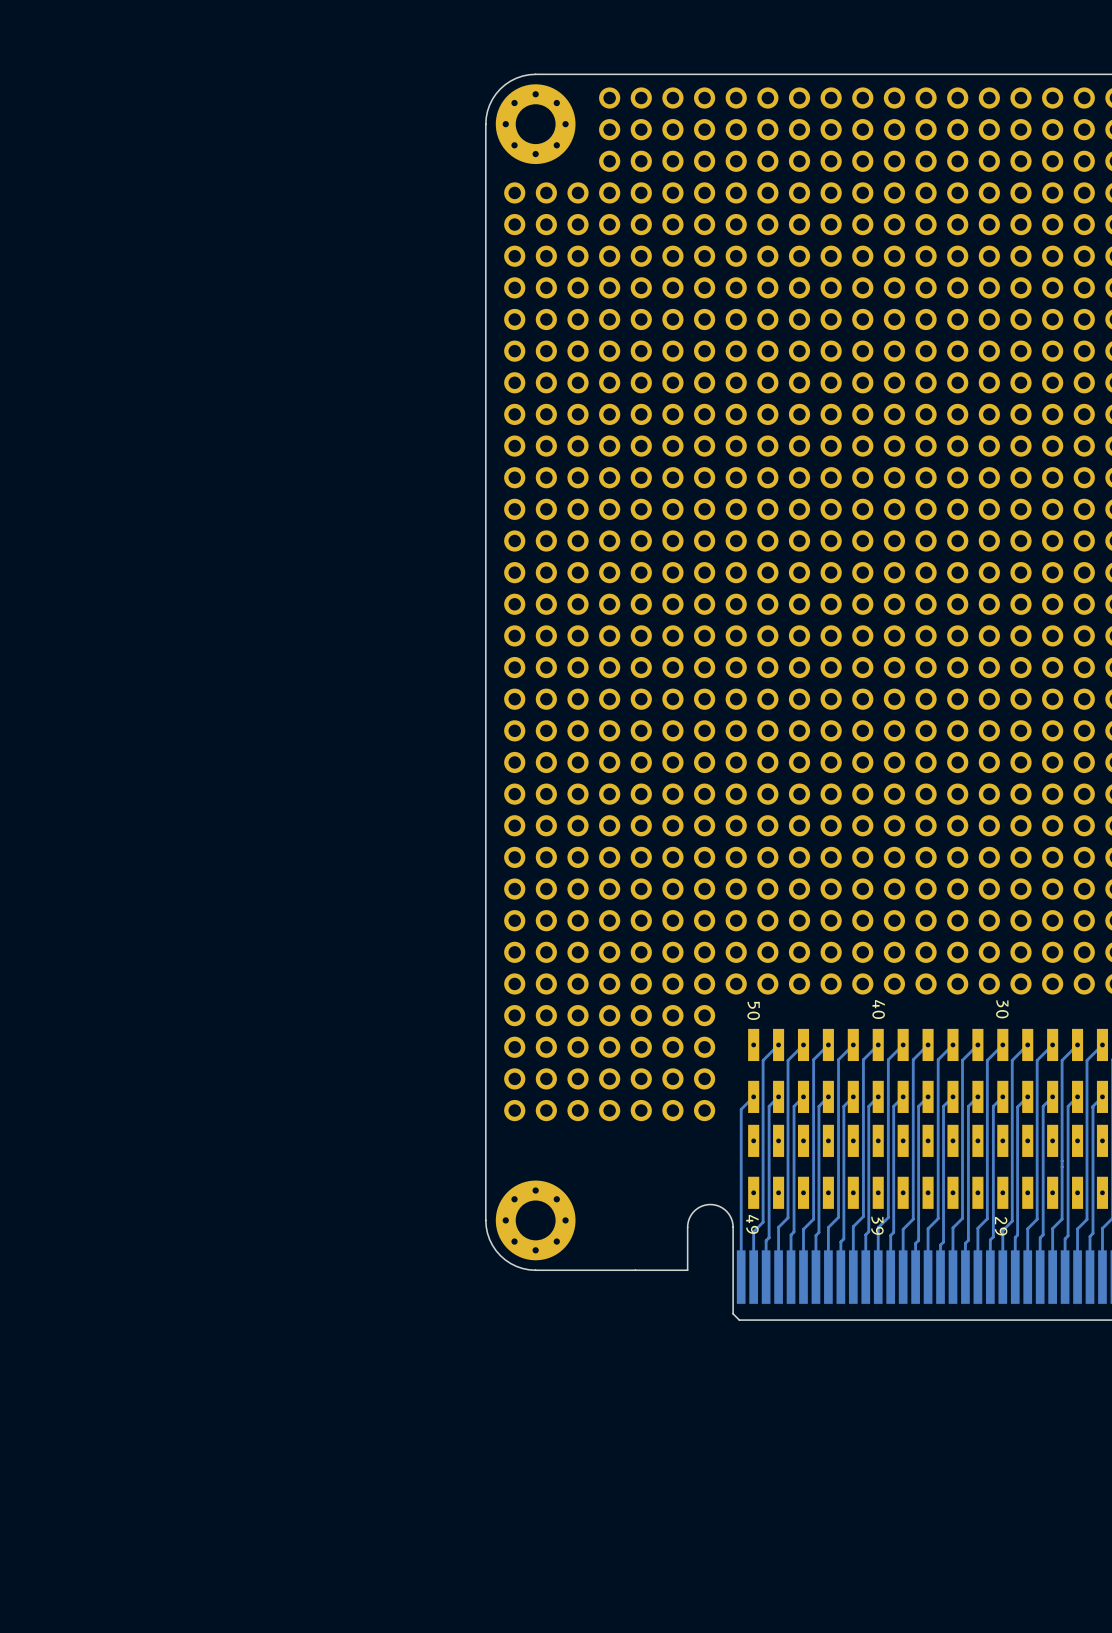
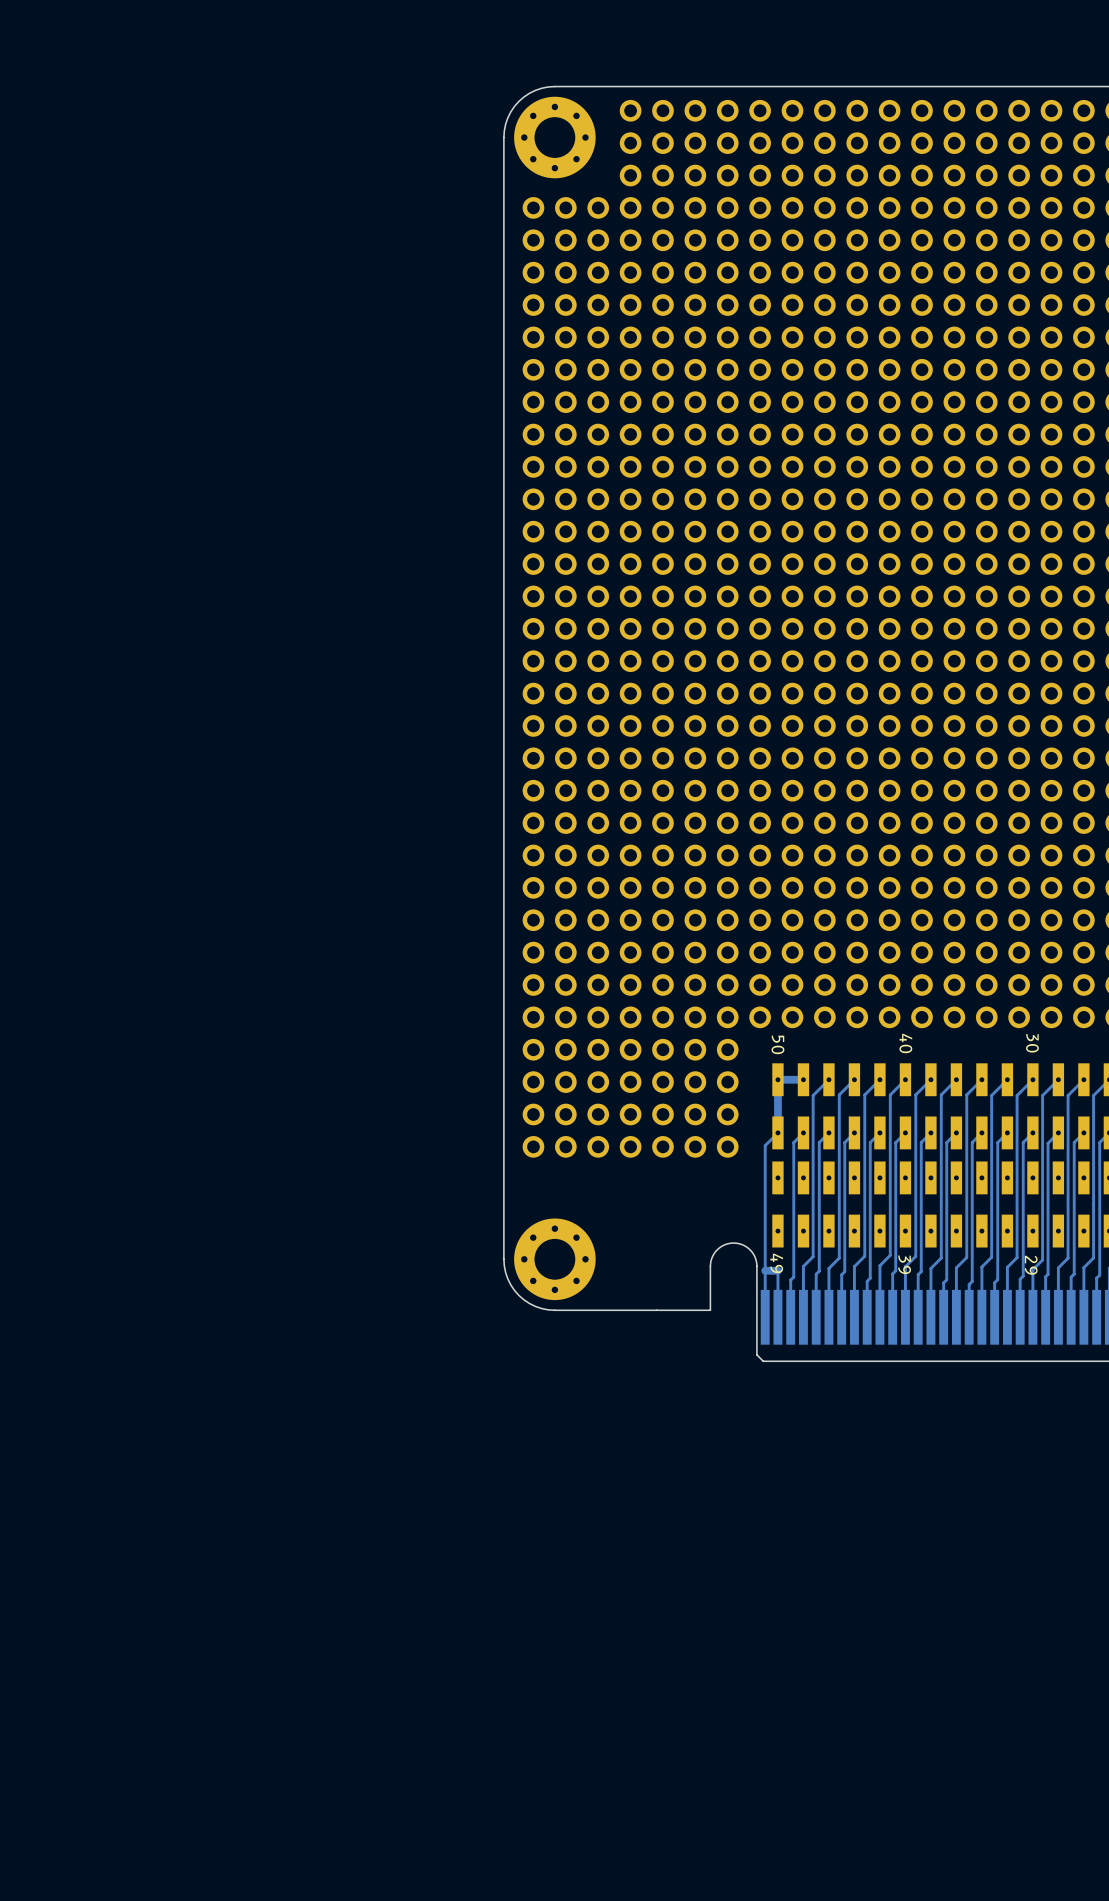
track: (778, 1044) (763, 1060) (763, 1222) (753, 1231) -> (803, 1079) (777, 1079) (777, 1132)
track: none -> (777, 1270) (765, 1270)

